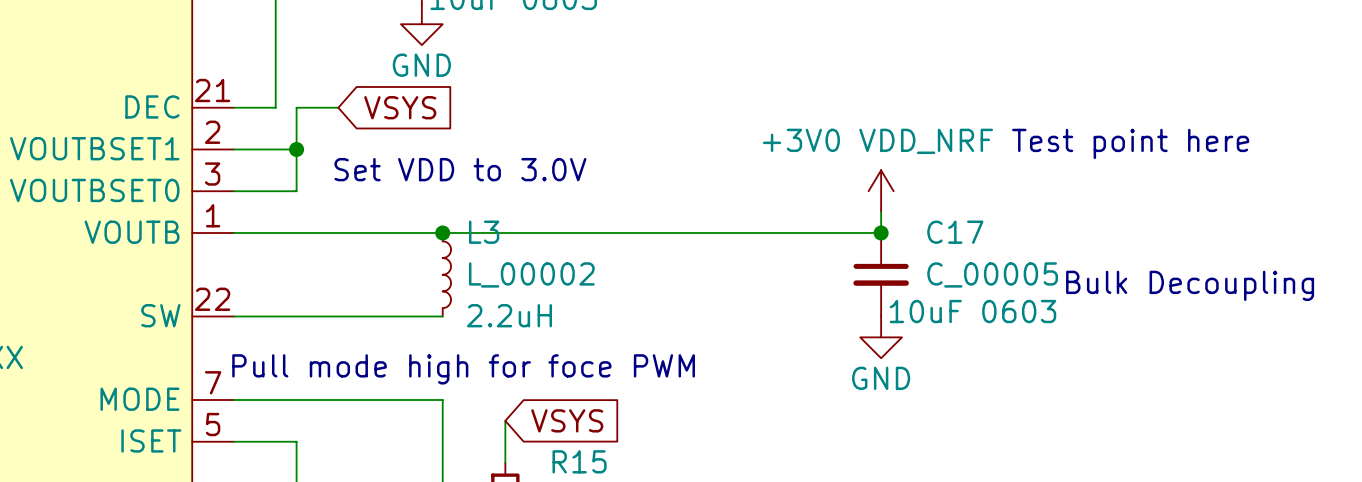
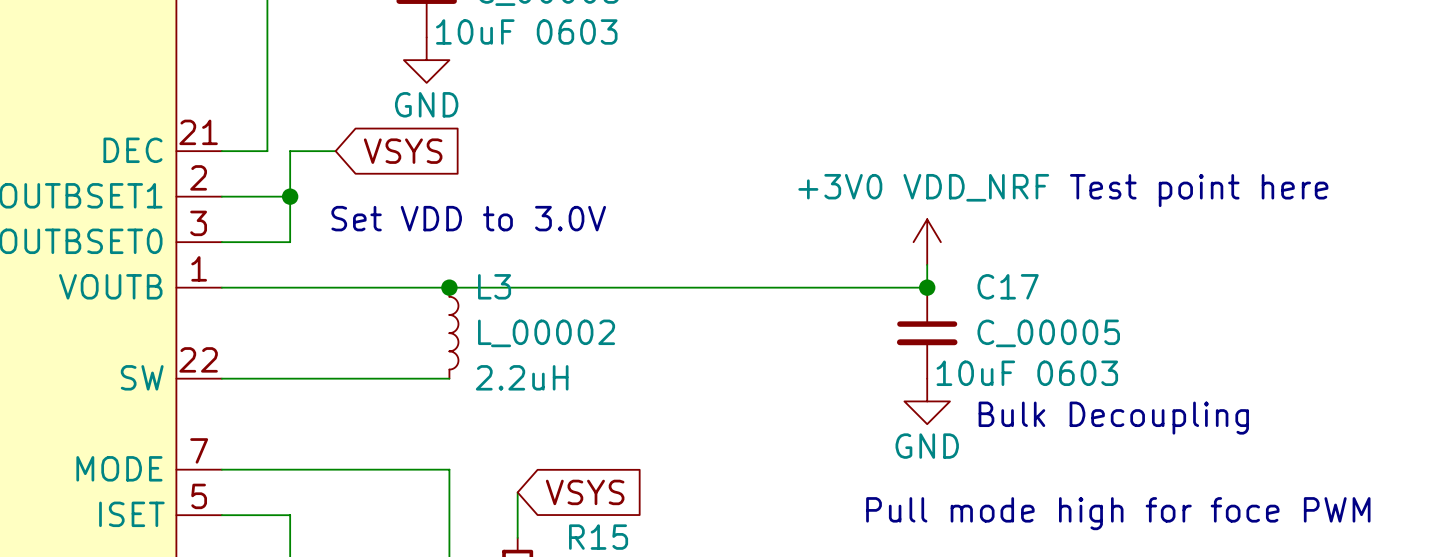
text position: Bulk Decoupling (1190, 285) -> Bulk Decoupling (1113, 418)
text: Pull mode high for foce PWM (463, 369) -> none
text: none -> Pull mode high for foce PWM (1118, 513)

